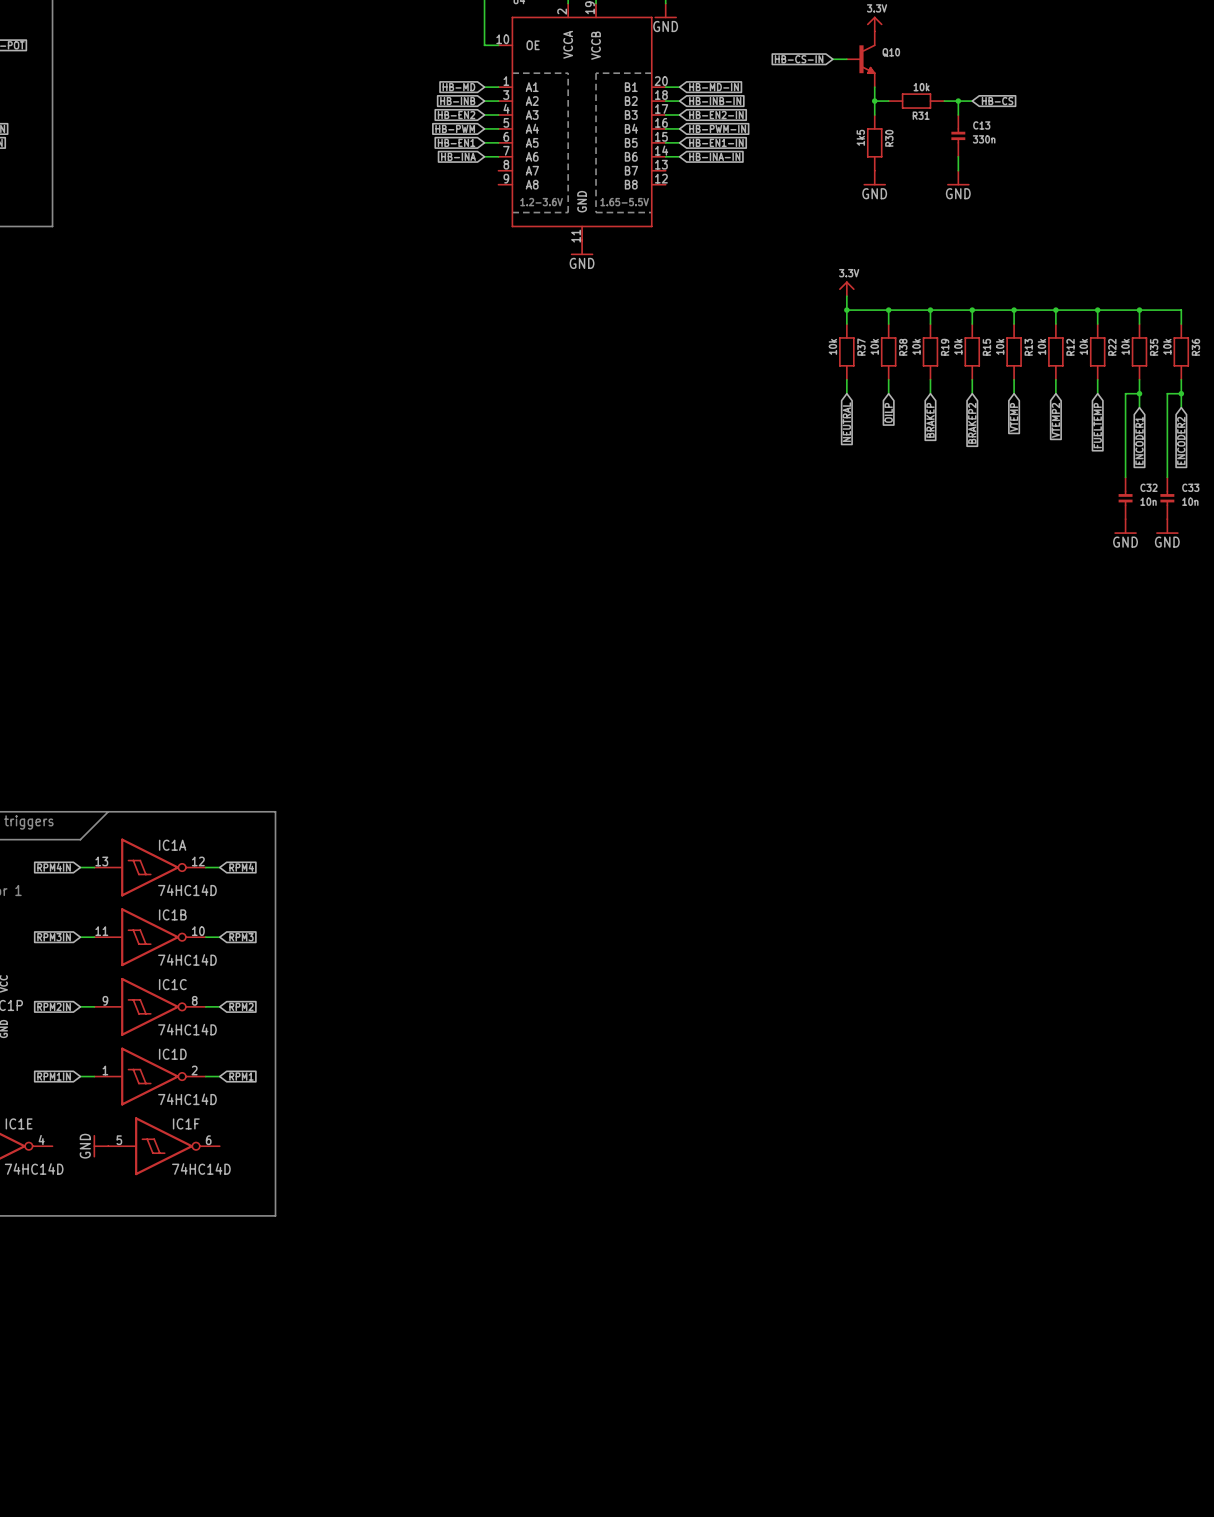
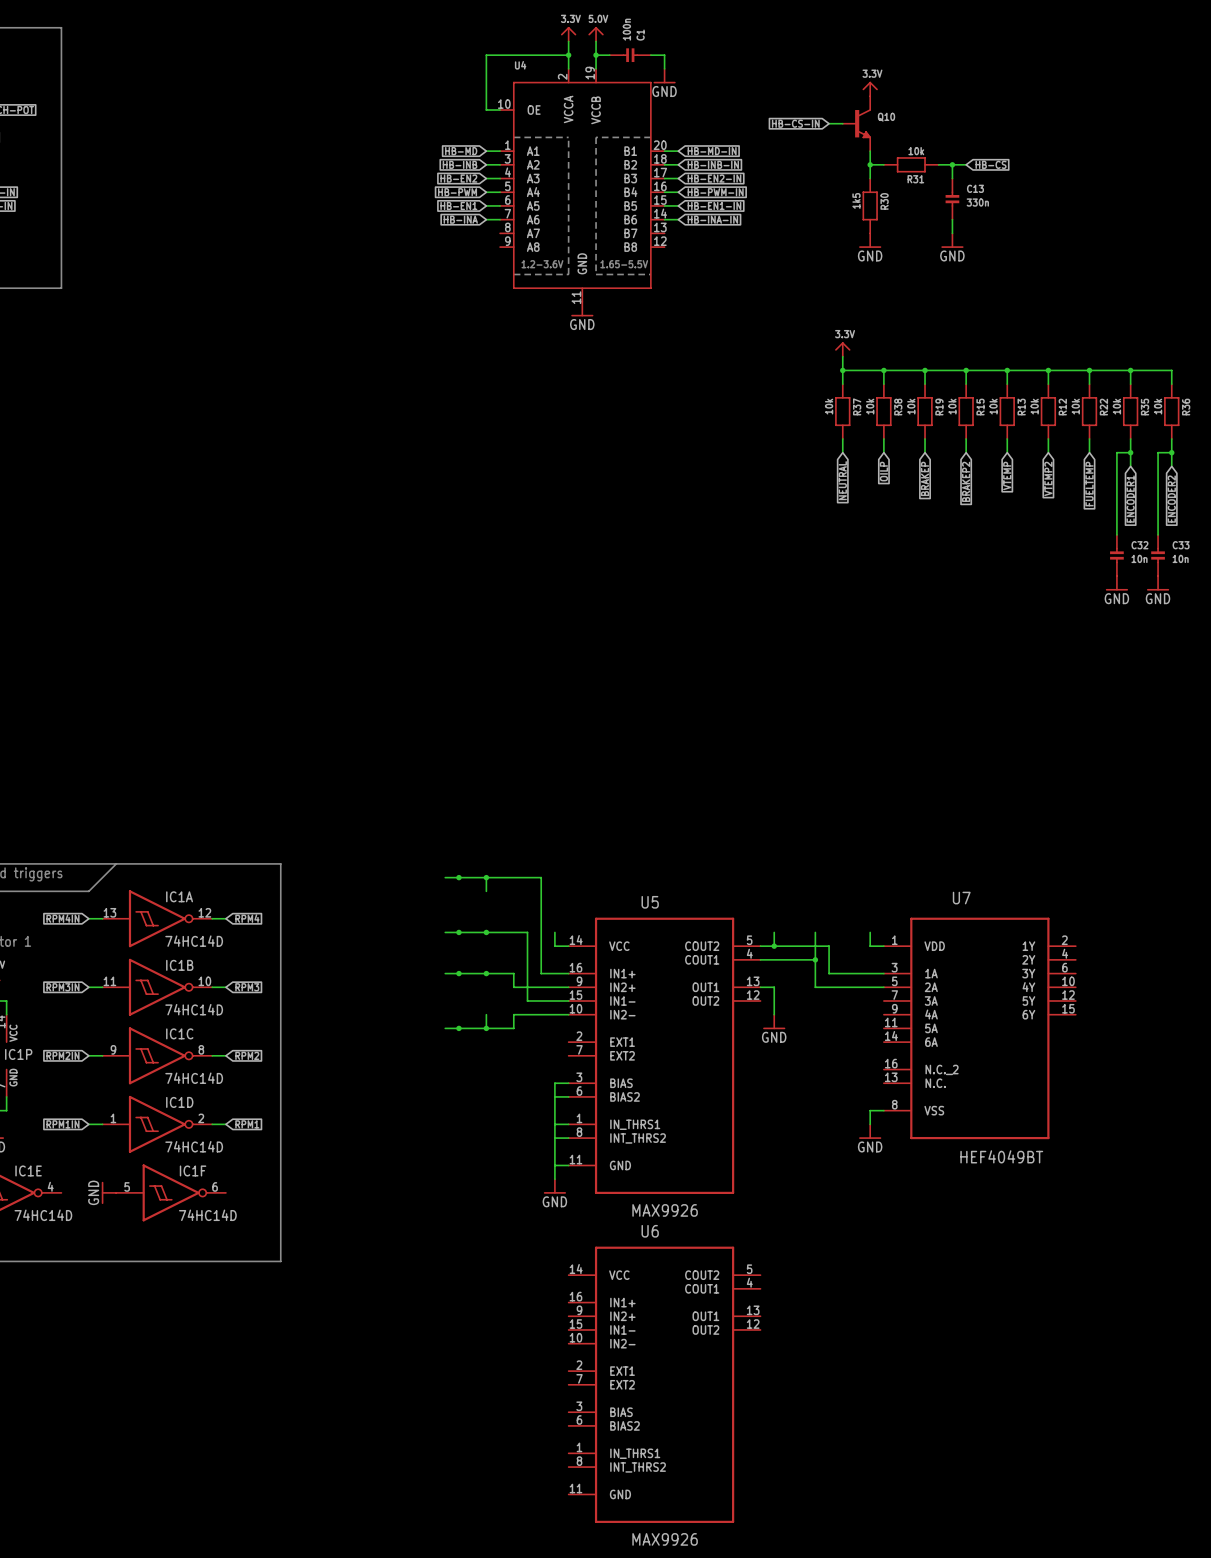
wire: none -> (445, 877) (541, 877) (541, 973) (568, 973)
junction: none -> (458, 877)
wire: none -> (486, 877) (486, 891)
junction: none -> (486, 877)
wire: none -> (445, 932) (527, 932) (527, 1000) (568, 1000)
junction: none -> (458, 932)
junction: none -> (486, 932)
wire: none -> (554, 932) (554, 946) (568, 946)
wire: none -> (774, 932) (774, 946)
wire: none -> (815, 932) (815, 987) (883, 987)
wire: none -> (870, 932) (870, 946) (883, 946)
wire: none -> (760, 946) (829, 946) (829, 973) (883, 973)
junction: none -> (774, 946)
wire: none -> (760, 959) (815, 959)
junction: none -> (815, 959)
wire: none -> (445, 973) (513, 973) (513, 987) (568, 987)
junction: none -> (458, 973)
junction: none -> (486, 973)
wire: none -> (760, 987) (774, 987) (774, 1014)
wire: none -> (486, 1014) (486, 1028)
wire: none -> (568, 1014) (513, 1014) (513, 1028) (445, 1028)
power symbol: none -> GND (774, 1021)
junction: none -> (458, 1028)
junction: none -> (486, 1028)
U7: none -> HEF4049BT (979, 1028)
U5: none -> MAX9926 (664, 1055)
wire: none -> (568, 1083) (554, 1083) (554, 1179)
wire: none -> (554, 1096) (568, 1096)
wire: none -> (883, 1110) (870, 1110) (870, 1124)
wire: none -> (554, 1124) (568, 1124)
power symbol: none -> GND (870, 1131)
wire: none -> (554, 1138) (568, 1138)
wire: none -> (554, 1165) (568, 1165)
power symbol: none -> GND (554, 1186)
U6: none -> MAX9926 (664, 1384)

